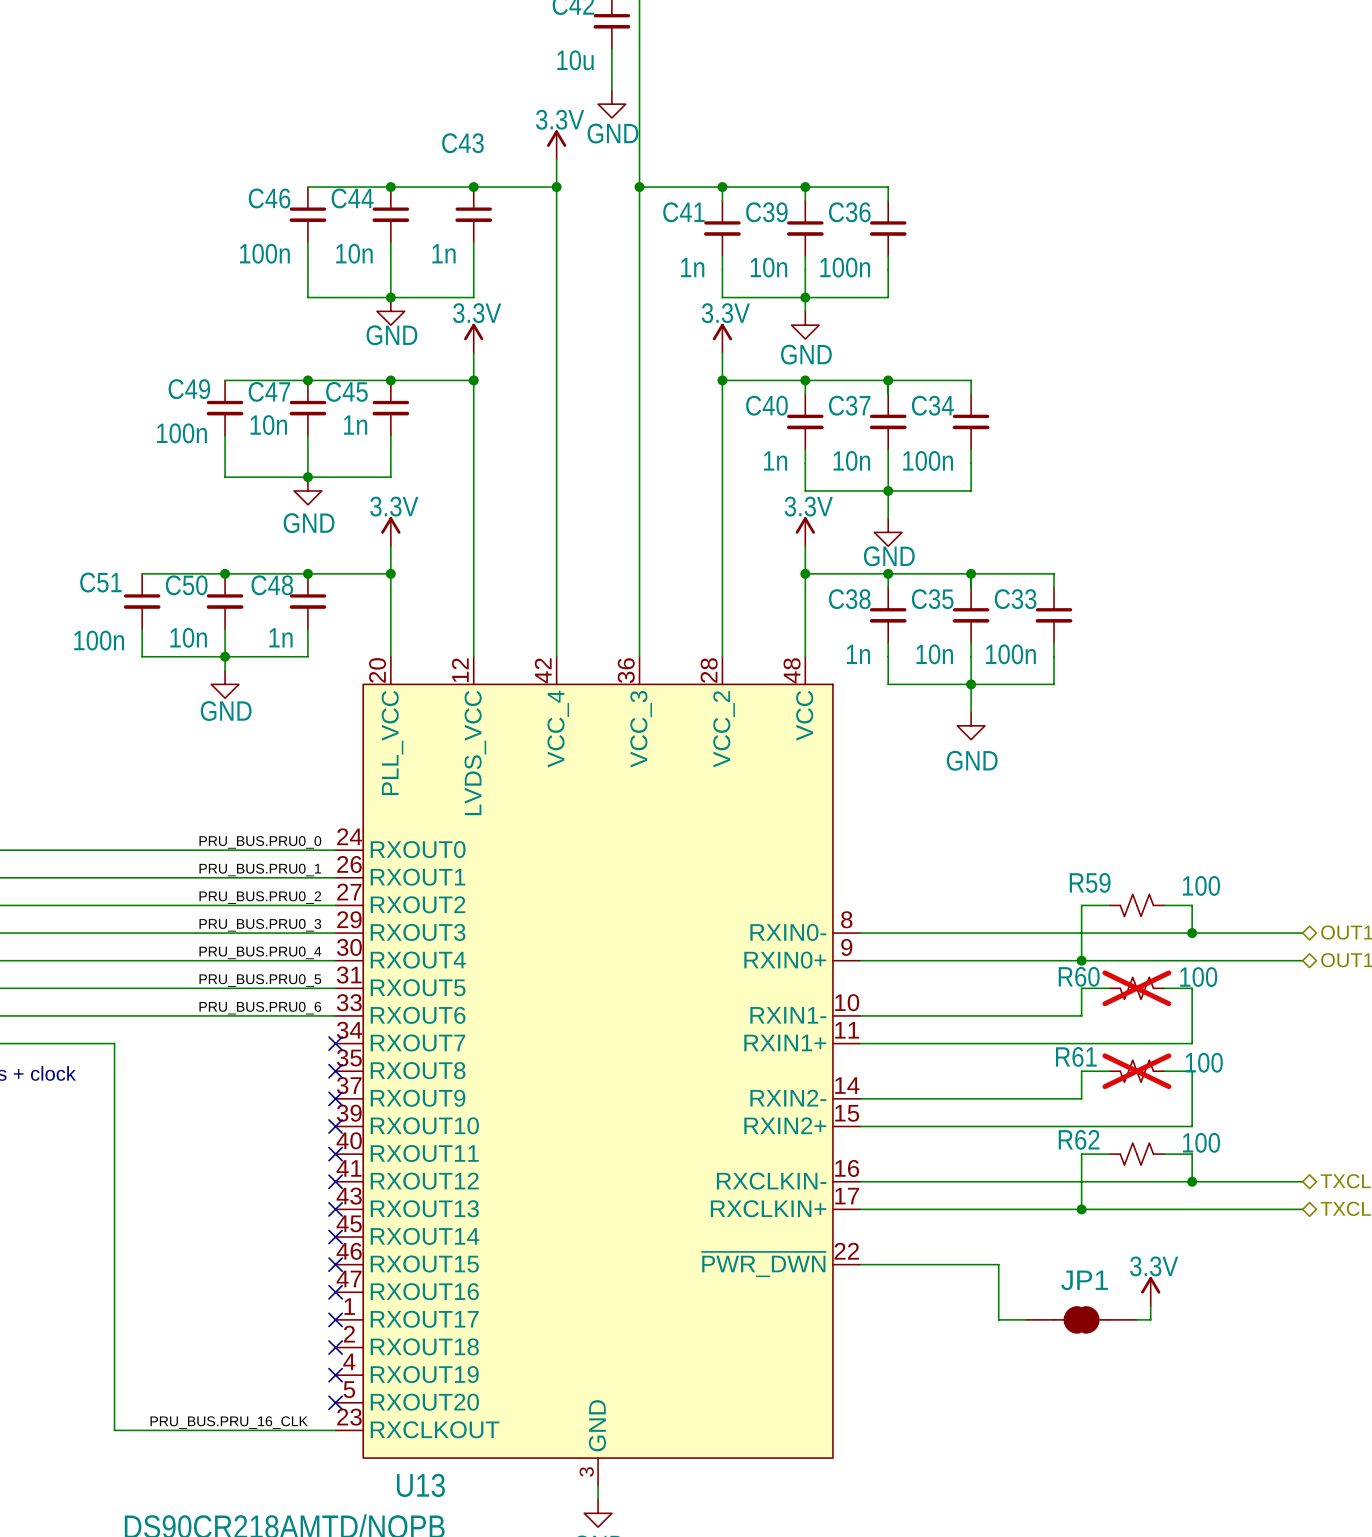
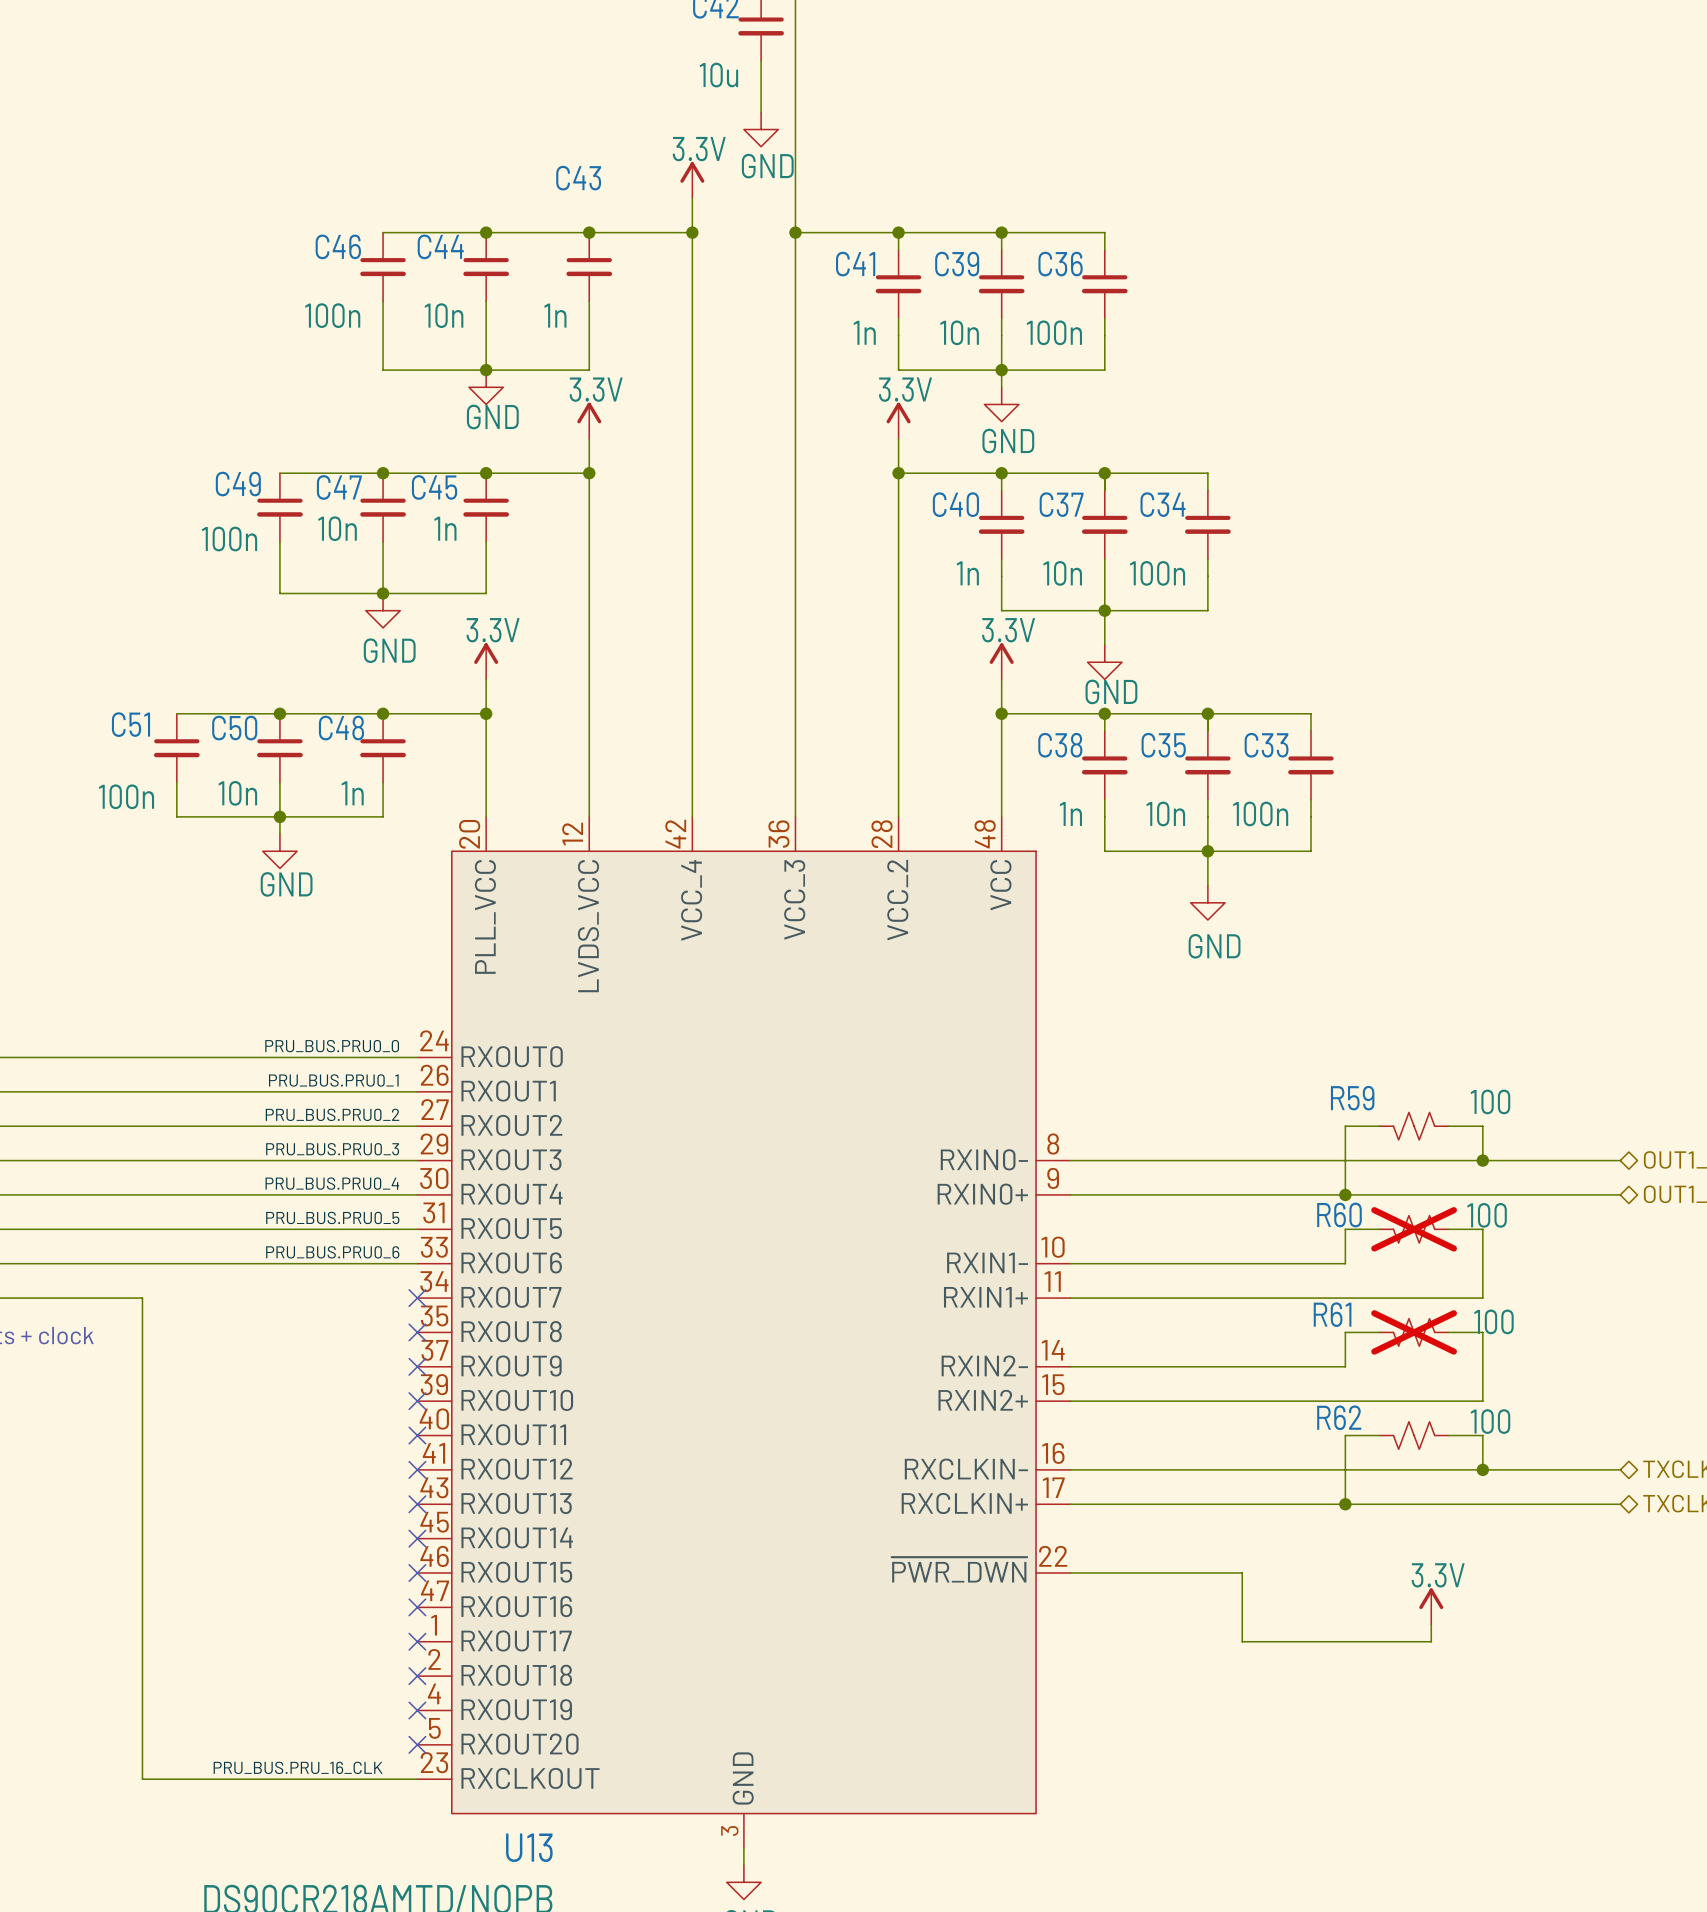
JP1: (1081, 1319) -> none

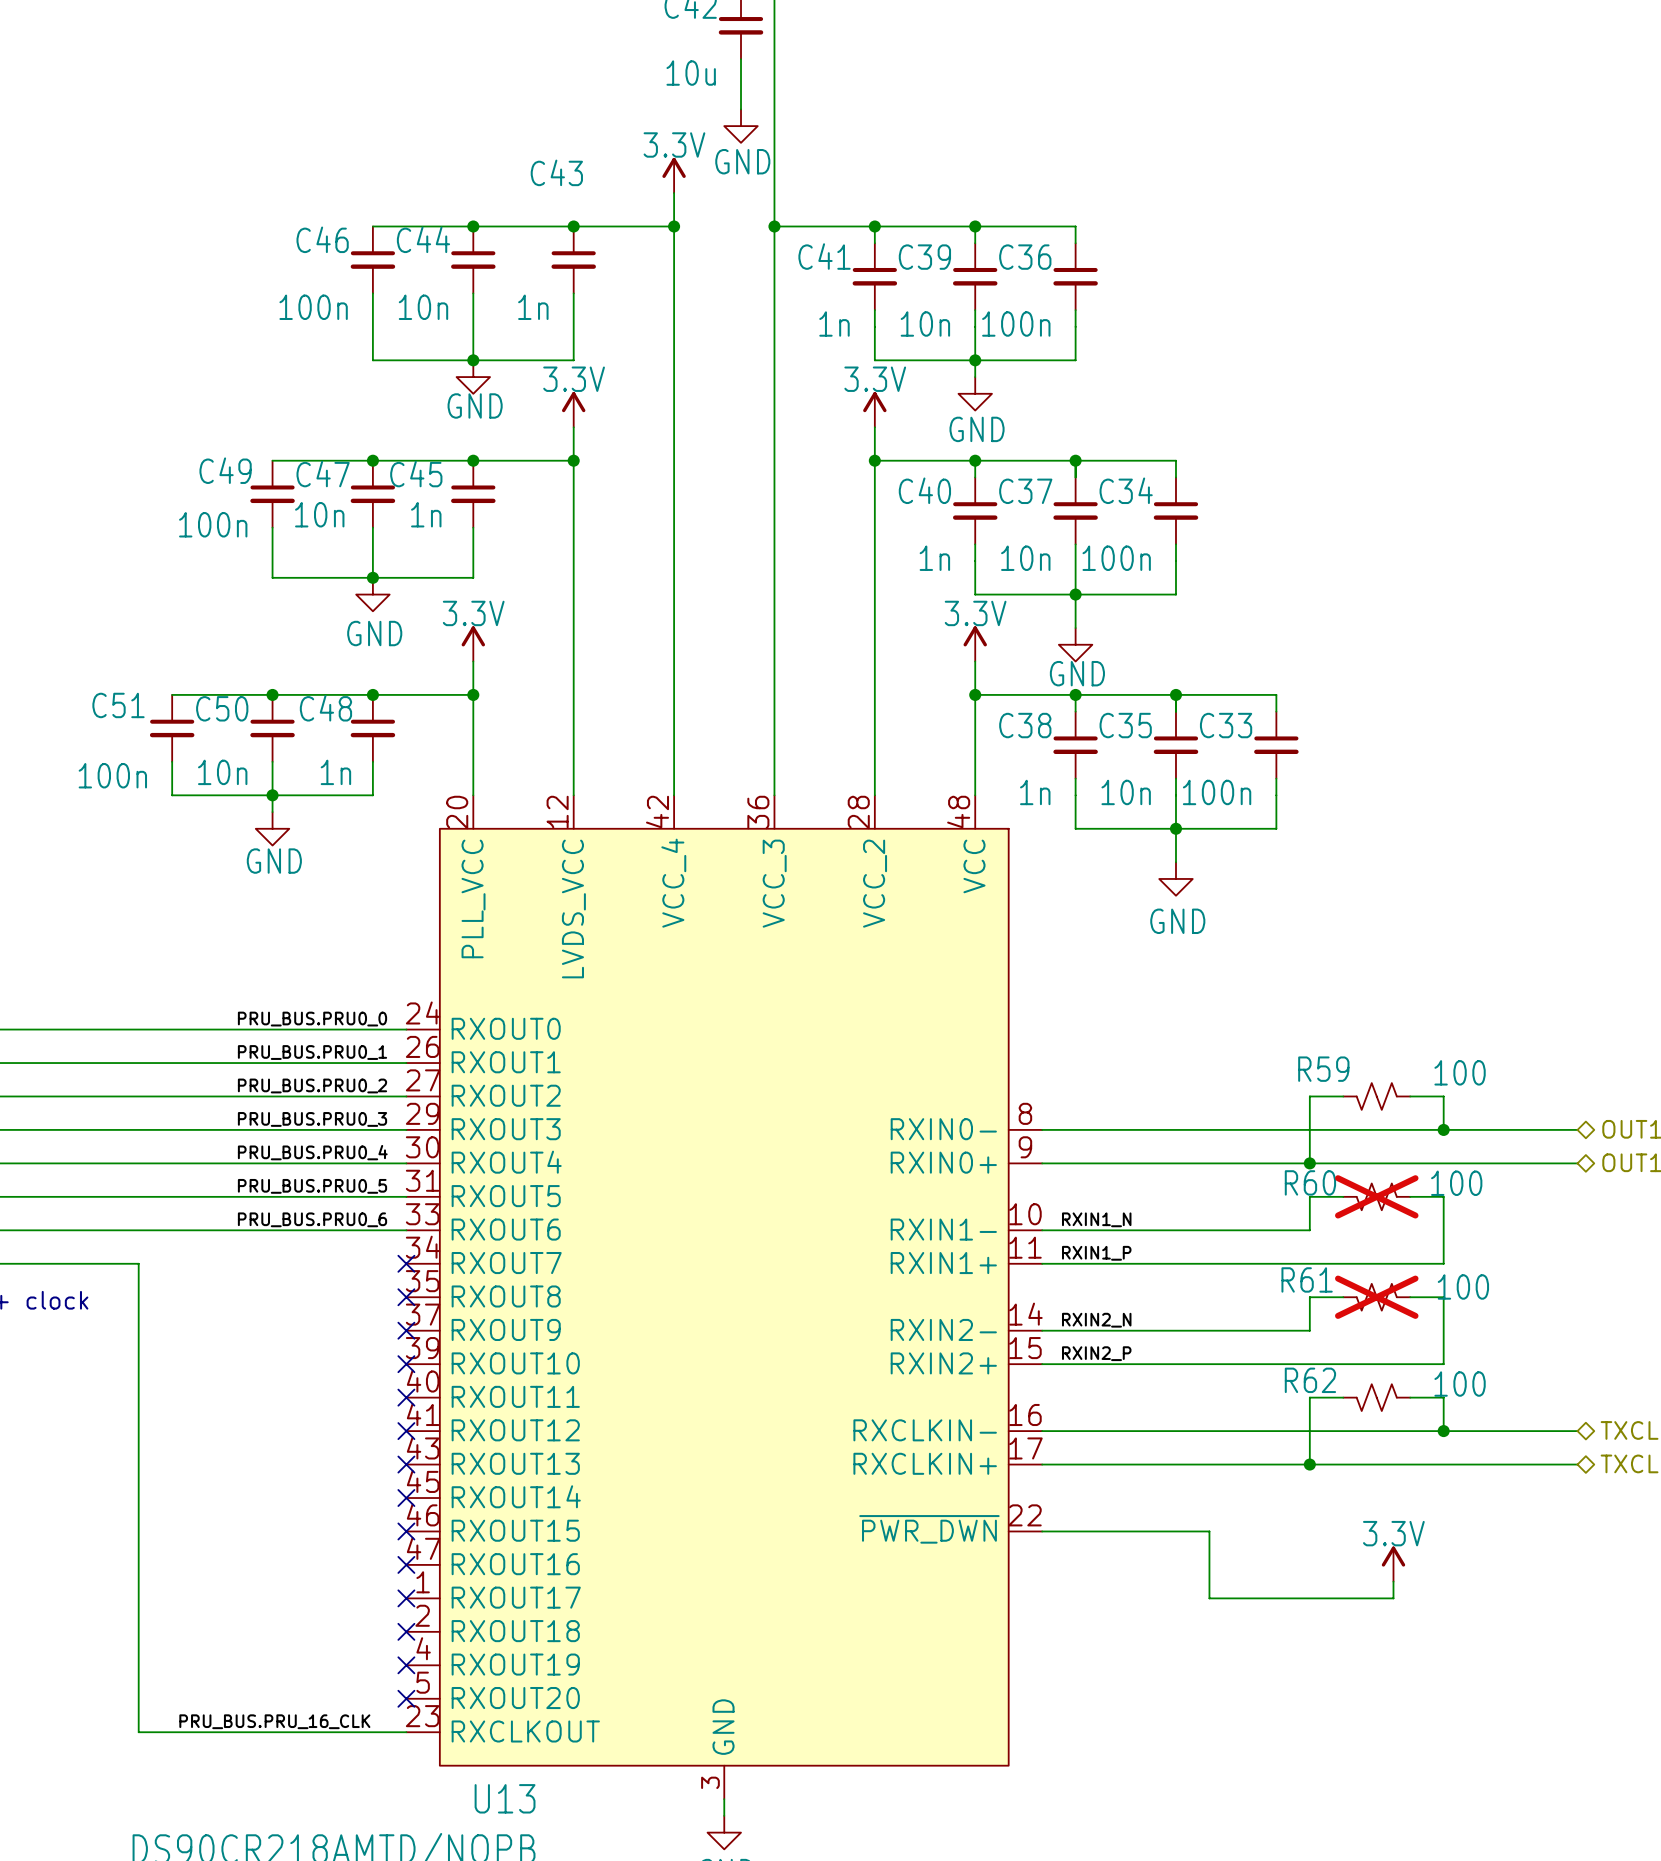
label: none -> RXIN1_N (1096, 1219)
label: none -> RXIN1_P (1096, 1253)
label: none -> RXIN2_N (1096, 1320)
label: none -> RXIN2_P (1096, 1353)

